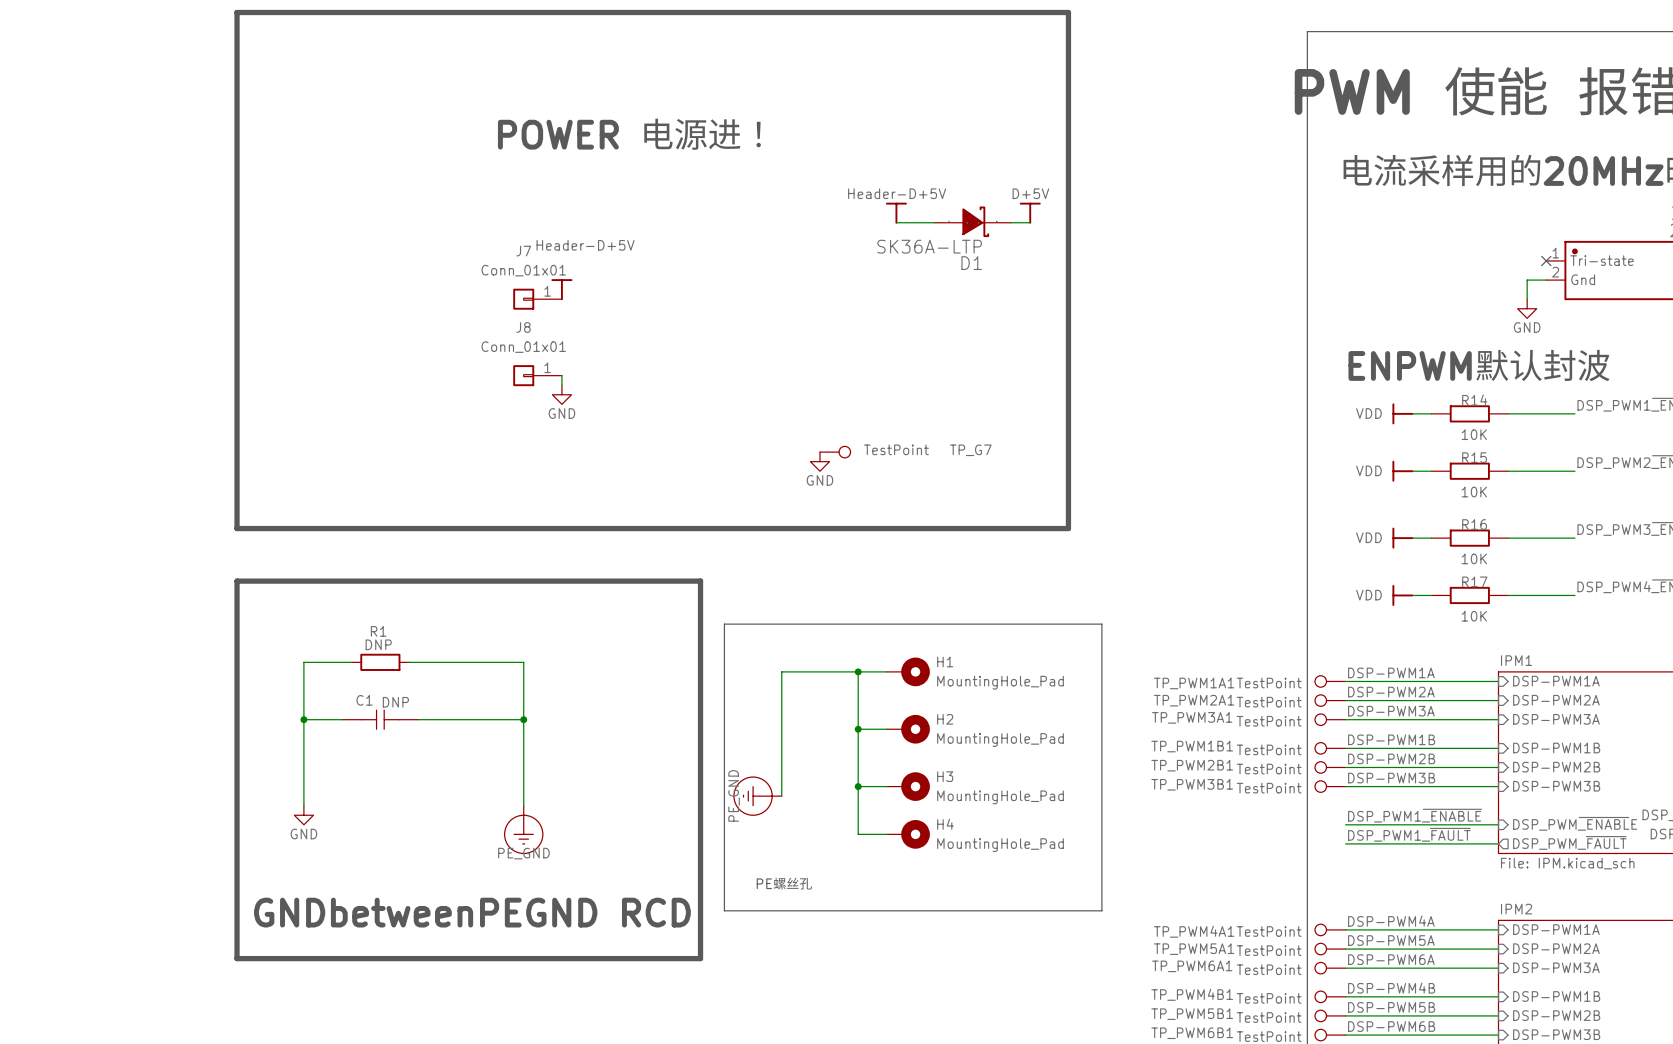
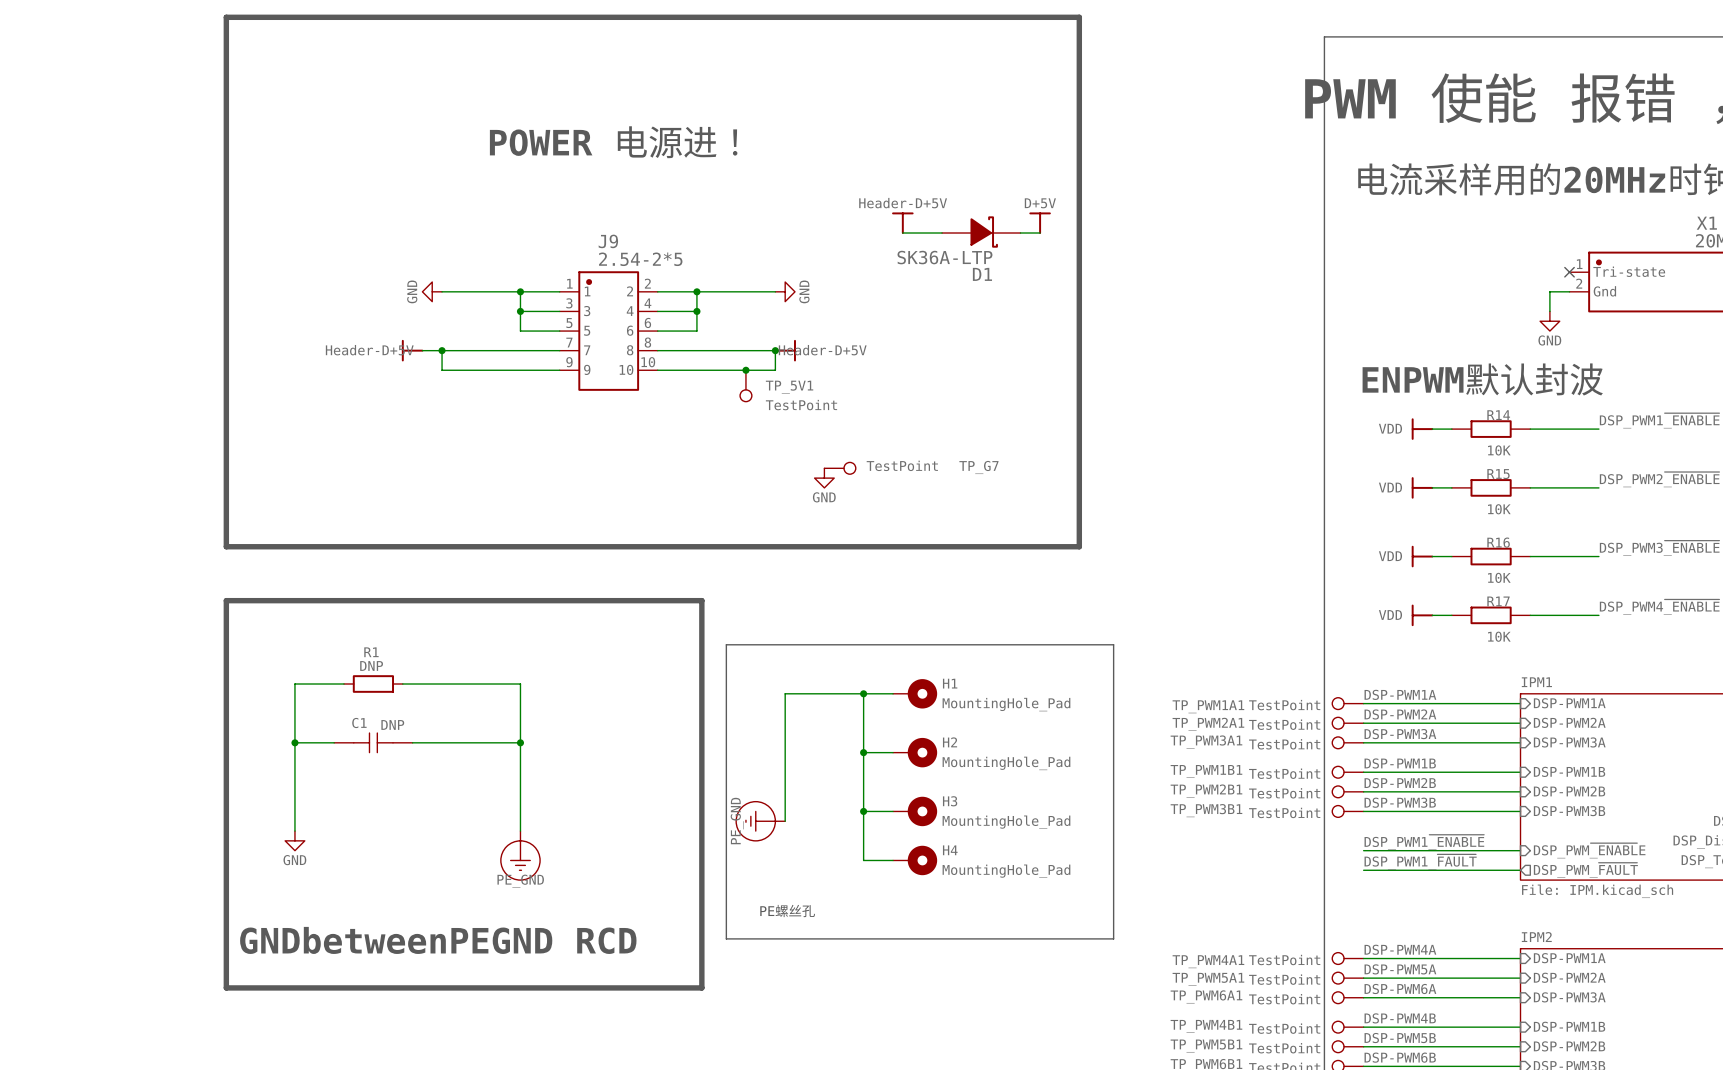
power symbol: none -> GND (432, 291)
wire: none -> (442, 291) (559, 291)
wire: none -> (520, 291) (520, 331) (559, 331)
junction: none -> (520, 291)
wire: none -> (657, 291) (775, 291)
wire: none -> (696, 291) (696, 331) (657, 331)
junction: none -> (696, 291)
power symbol: none -> GND (785, 291)
power symbol: Header-D+5V (561, 289) -> none
junction: none -> (520, 311)
J7: Conn_01x01 (537, 299) -> none
wire: none -> (657, 311) (696, 311)
junction: none -> (696, 311)
J9: none -> 2.54-2*5 (608, 331)
power symbol: none -> Header-D+5V (412, 350)
wire: none -> (422, 350) (559, 350)
wire: none -> (442, 350) (442, 370) (559, 370)
junction: none -> (442, 350)
wire: none -> (657, 350) (775, 350) (775, 370) (657, 370)
junction: none -> (775, 350)
power symbol: none -> Header-D+5V (785, 350)
junction: none -> (745, 370)
TP_5V1: none -> TestPoint (745, 385)
J8: Conn_01x01 (537, 375) -> none
wire: (561, 375) (561, 385) -> none
power symbol: GND (561, 394) -> none

